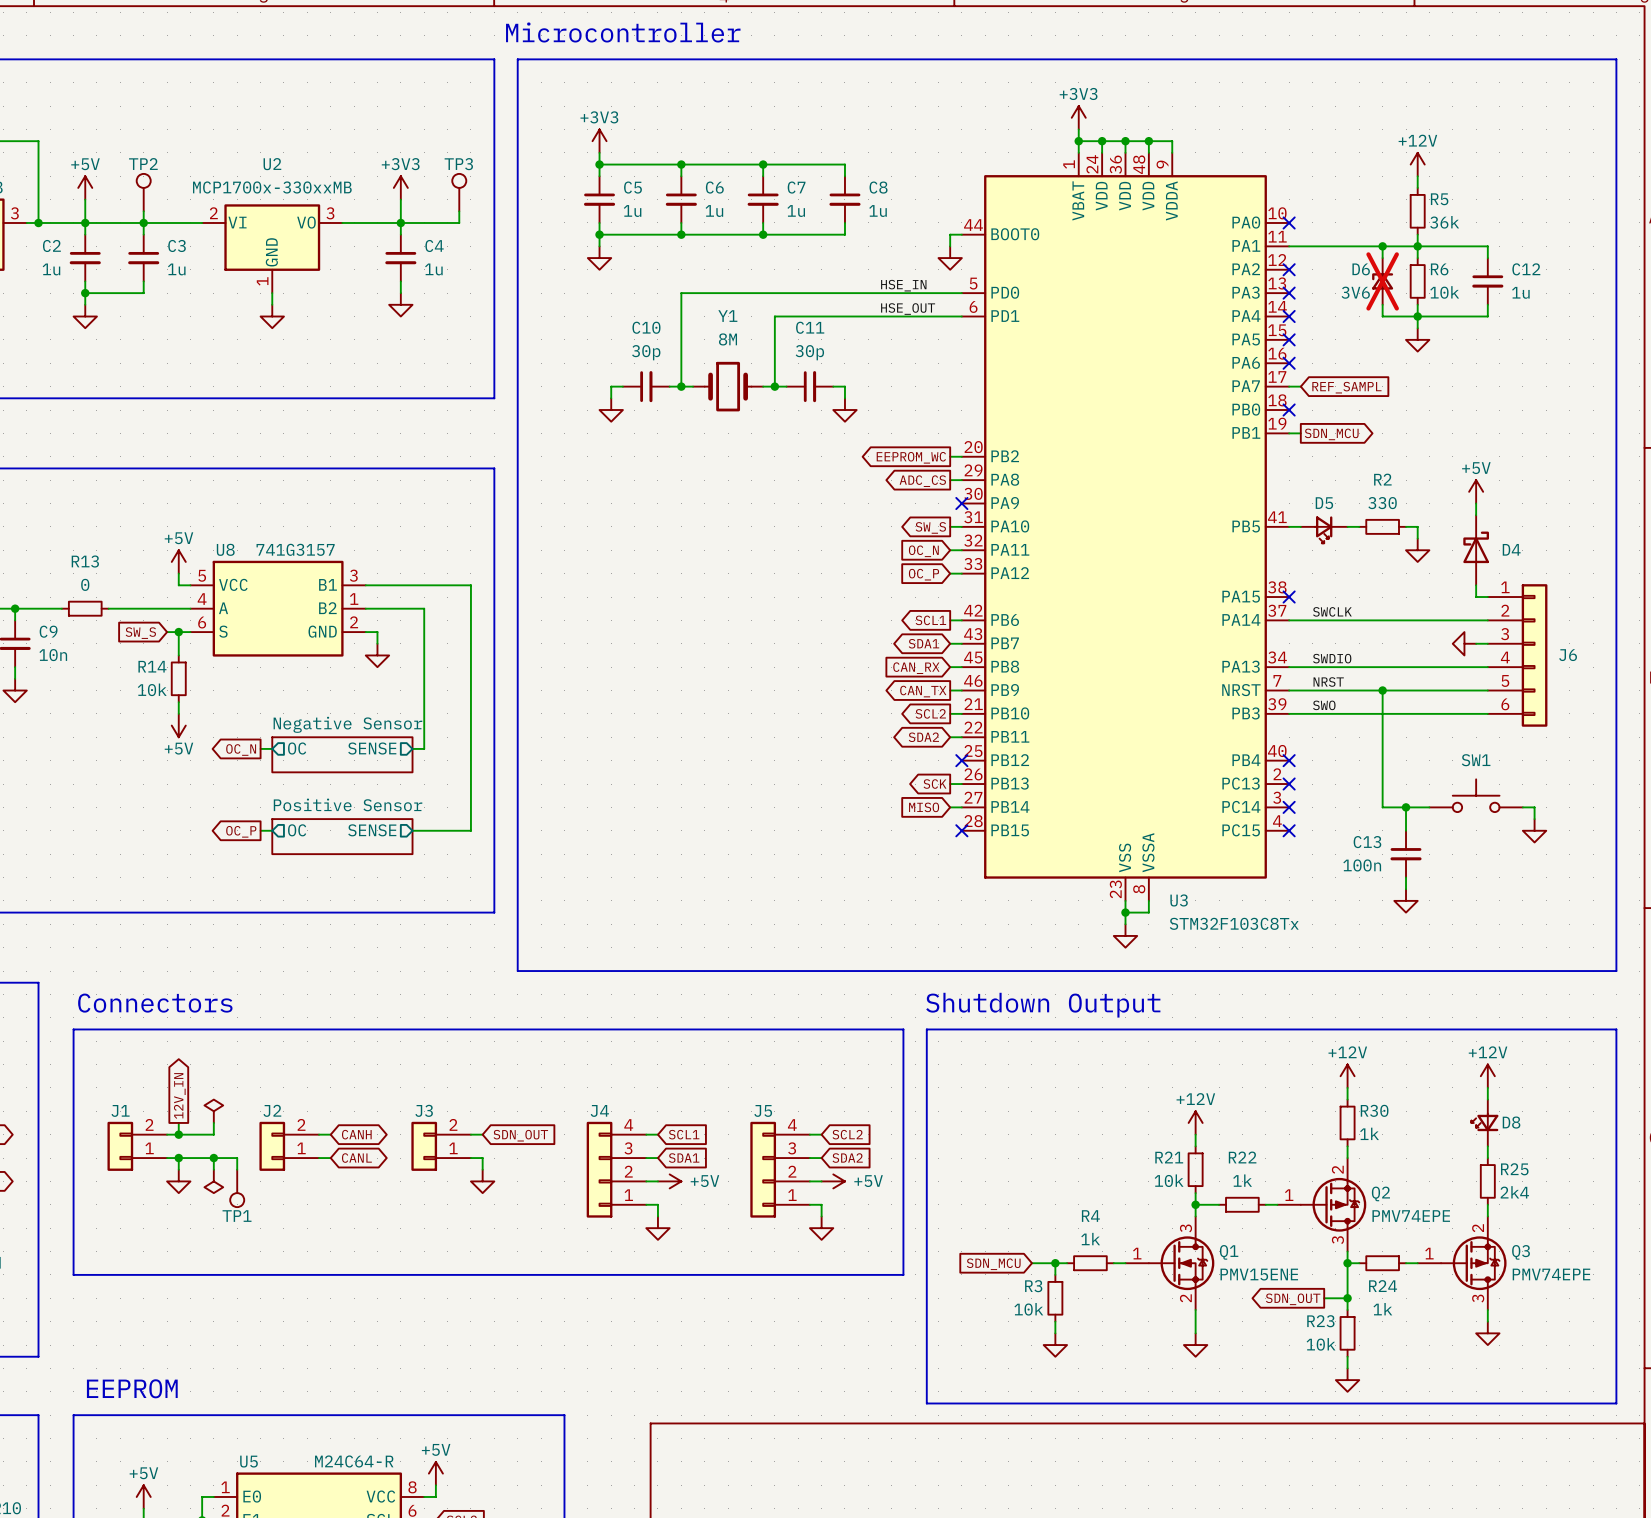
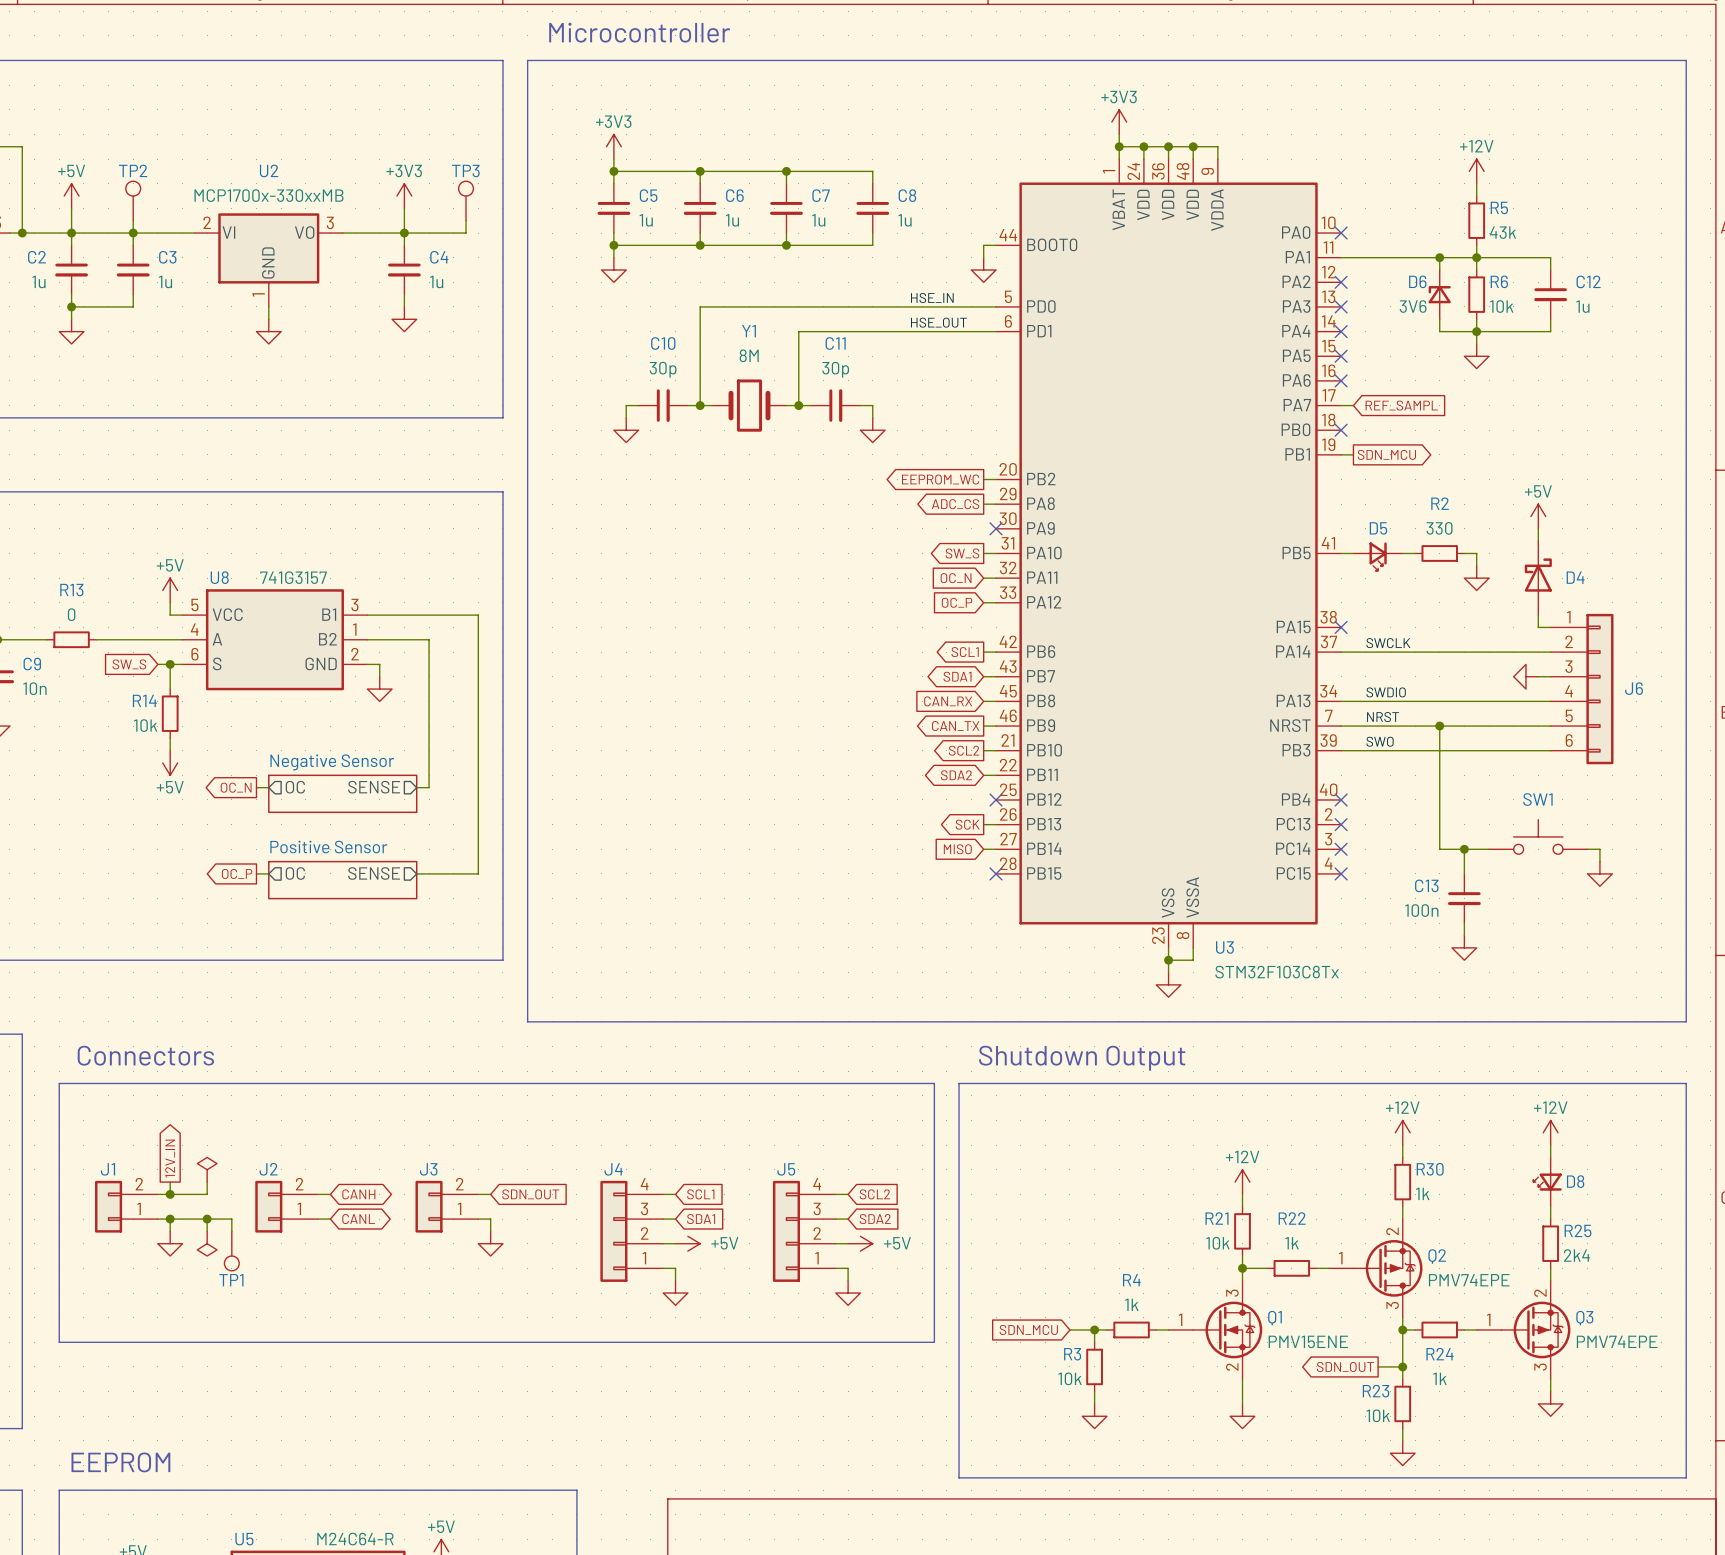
R5 value: 36k (1444, 222) -> 43k (1502, 232)
D6 do-not-place cross: (1382, 281) -> none

